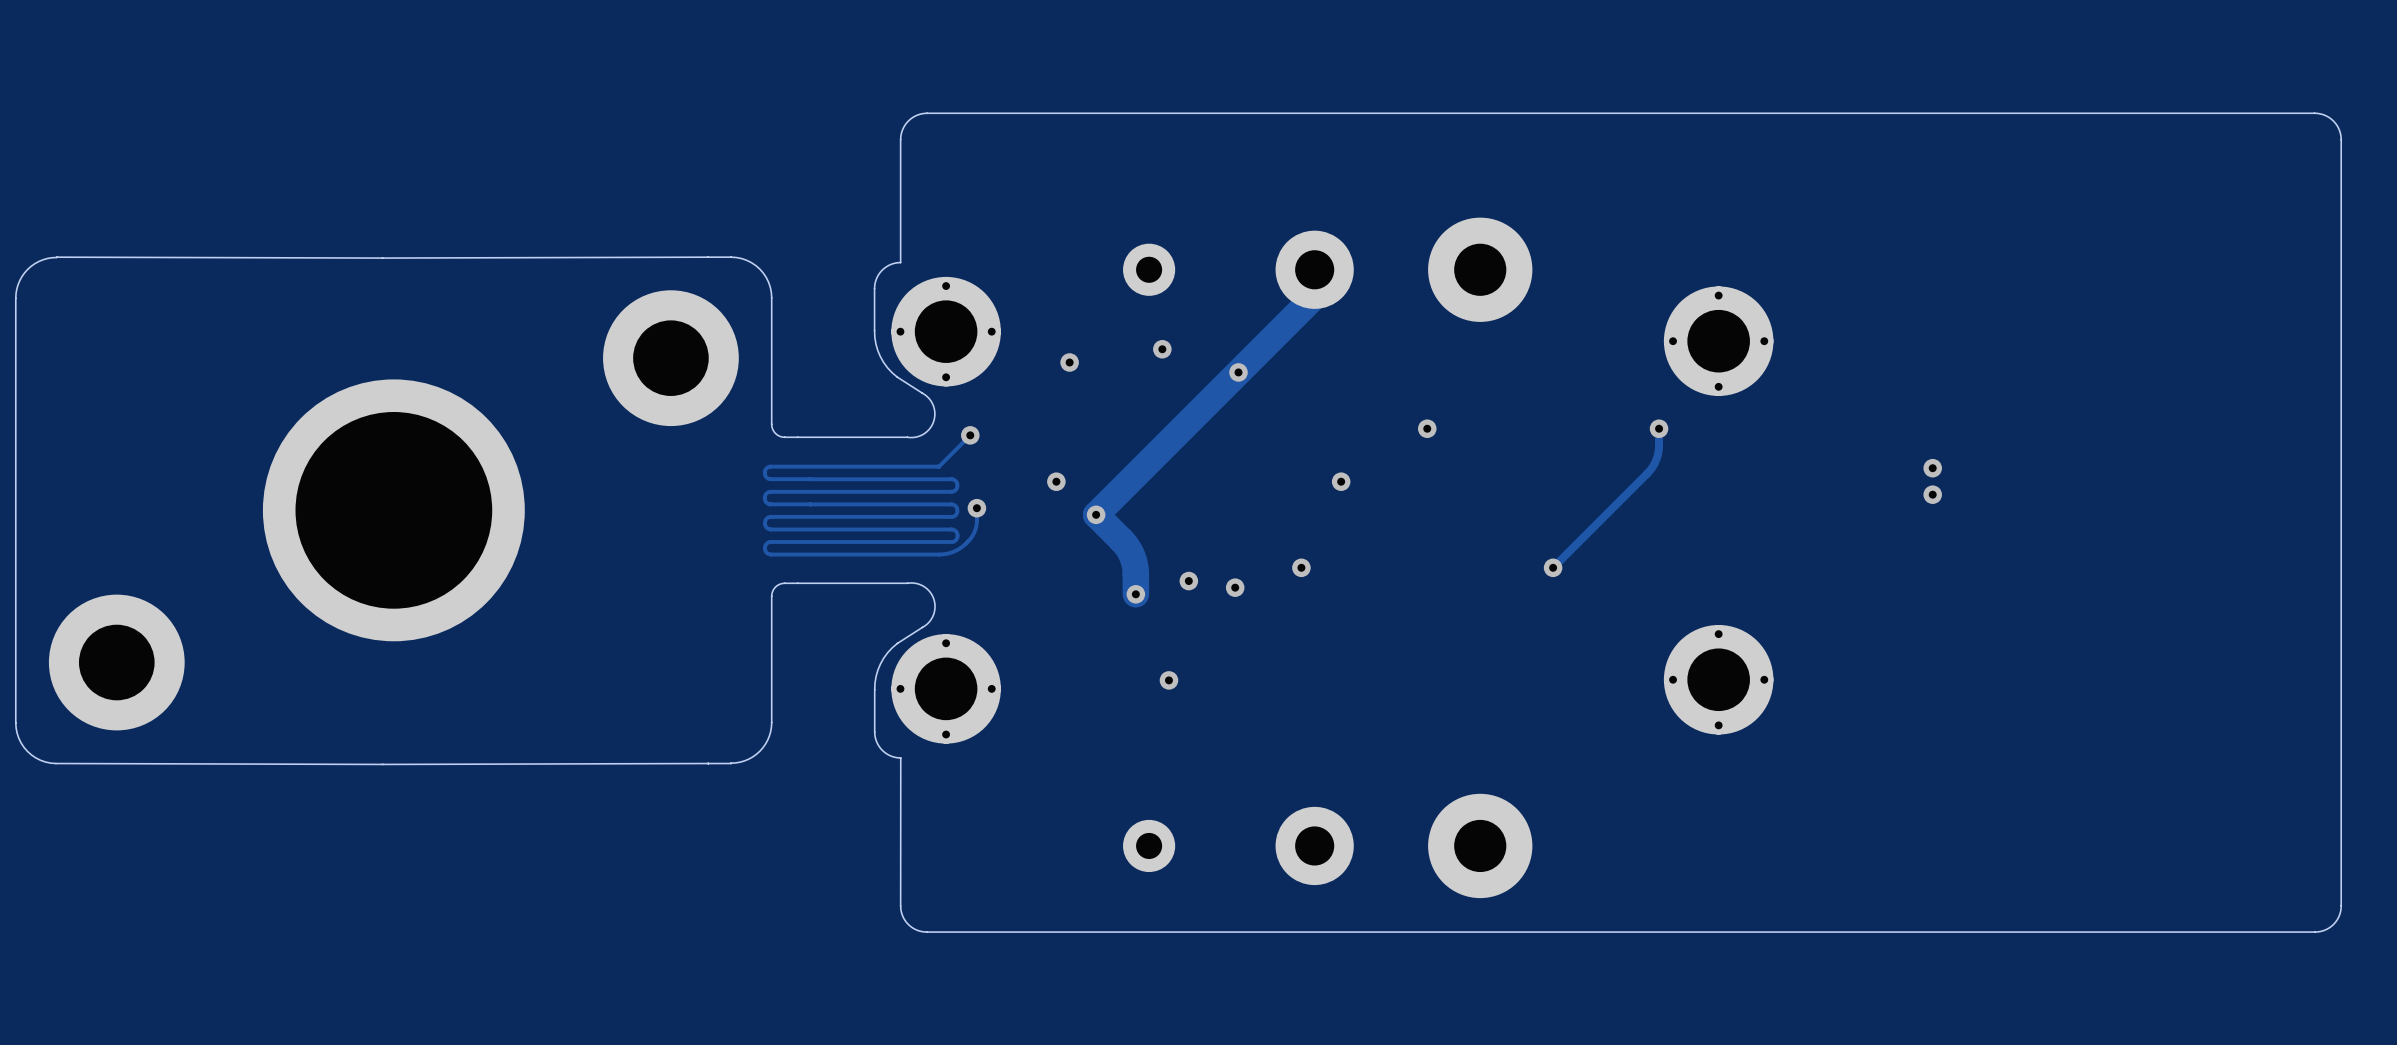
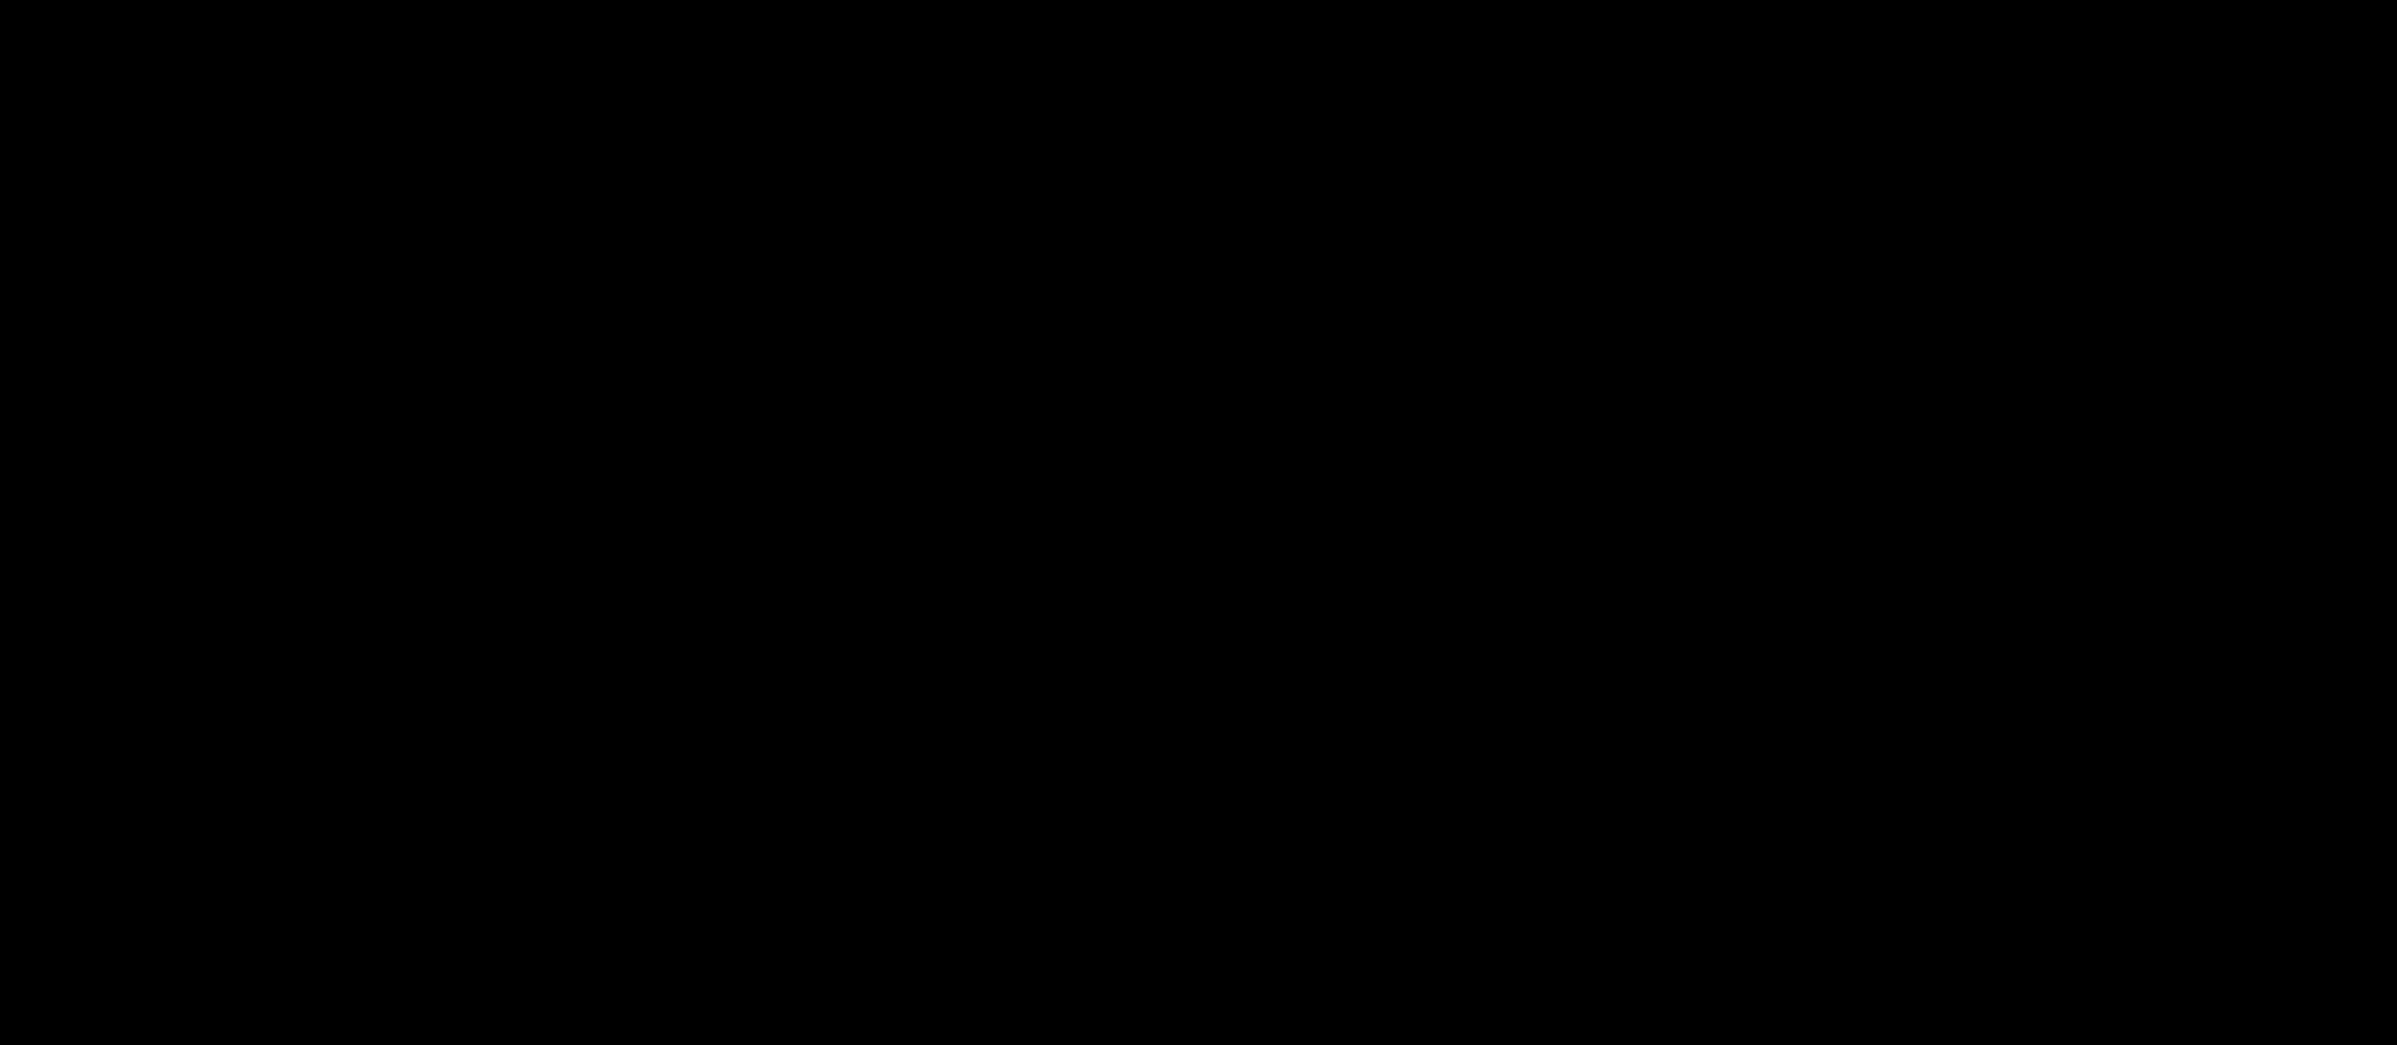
part: (1149, 269) -> none
part: (1314, 269) -> none
part: (1480, 269) -> none
track: (1321, 289) (1096, 514) (1130, 551) (1135, 569) (1135, 594) -> none
part: (946, 331) -> none
part: (1718, 341) -> none
via: (1162, 349) -> none
part: (670, 358) -> none
via: (1069, 362) -> none
via: (1238, 372) -> none
via: (1427, 428) -> none
track: (1659, 428) (1658, 453) (1649, 470) (1553, 567) -> none
via: (1659, 428) -> none
track: (970, 435) (938, 466) -> none
via: (970, 435) -> none
track: (770, 466) (766, 468) (764, 472) -> none
track: (938, 466) (769, 466) -> none
via: (1932, 468) -> none
track: (764, 473) (766, 477) (770, 479) (951, 479) (955, 480) (957, 485) -> none
via: (1056, 481) -> none
via: (1341, 481) -> none
track: (957, 485) (955, 490) (951, 491) (770, 491) (766, 493) (764, 497) -> none
via: (1932, 494) -> none
track: (764, 498) (766, 502) (770, 504) -> none
track: (769, 504) (951, 504) (955, 506) (957, 510) -> none
track: (976, 508) (976, 526) (971, 536) (962, 546) (949, 553) (771, 554) -> none
via: (976, 508) -> none
part: (393, 510) -> none
track: (957, 511) (955, 515) (951, 516) -> none
via: (1096, 514) -> none
track: (951, 516) (770, 516) (766, 518) (764, 522) -> none
track: (764, 523) (766, 527) (770, 529) (951, 529) (955, 531) (957, 535) -> none
track: (957, 536) (955, 540) (951, 541) (770, 541) (766, 543) (764, 547) -> none
track: (764, 548) (766, 552) (770, 554) -> none
via: (1301, 567) -> none
via: (1553, 567) -> none
via: (1188, 581) -> none
via: (1235, 587) -> none
via: (1135, 594) -> none
part: (116, 662) -> none
part: (1718, 679) -> none
via: (1168, 680) -> none
part: (946, 688) -> none
board edge: (731, 763) (744, 760) (756, 754) (765, 744) (770, 731) (771, 596) (775, 587) (784, 583) (913, 583) (922, 585) (931, 593) (934, 601) (933, 613) (927, 623) (892, 647) (880, 663) (875, 683) (874, 731) (876, 740) (882, 750) (889, 755) (900, 757) (900, 908) (908, 924) (920, 931) (2323, 930) (2335, 922) (2341, 905) (2339, 130) (2328, 117) (2314, 113) (920, 114) (908, 121) (900, 136) (900, 262) (892, 264) (882, 270) (876, 280) (874, 288) (874, 337) (880, 356) (892, 372) (927, 396) (933, 406) (934, 415) (931, 426) (924, 433) (913, 437) (784, 437) (775, 433) (771, 424) (770, 287) (763, 273) (755, 265) (736, 257) (57, 257) (38, 261) (24, 272) (18, 284) (15, 298) (15, 722) (21, 743) (31, 754) (45, 762) (55, 763) (708, 763) -> none
board edge: (731, 763) (707, 763) -> none
part: (1149, 845) -> none
part: (1314, 845) -> none
part: (1480, 845) -> none

